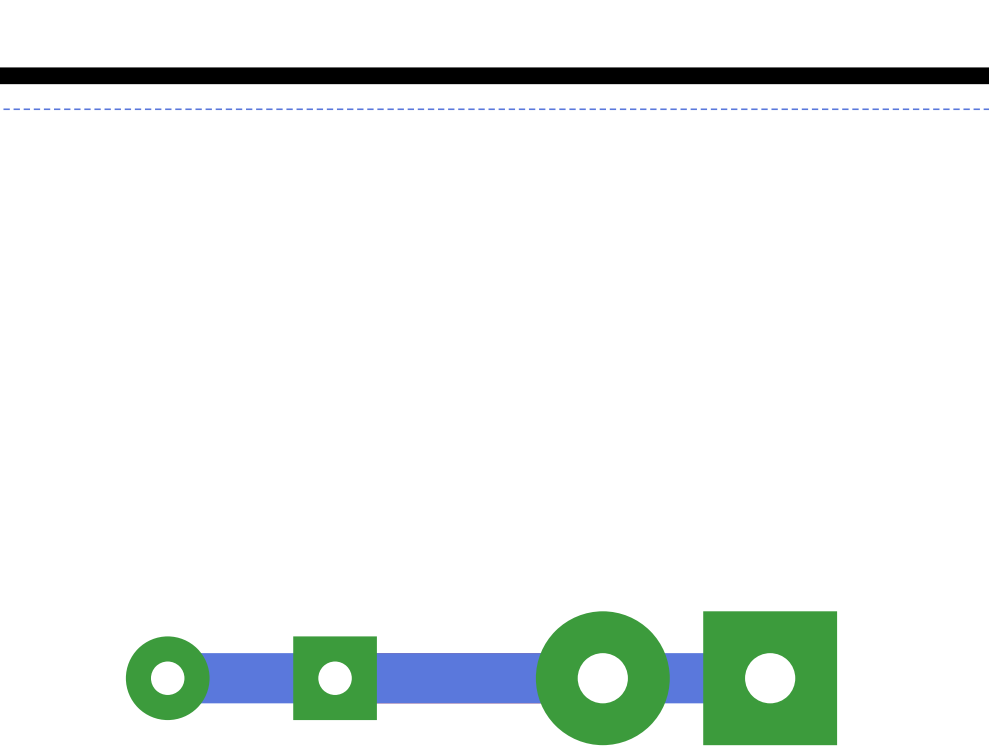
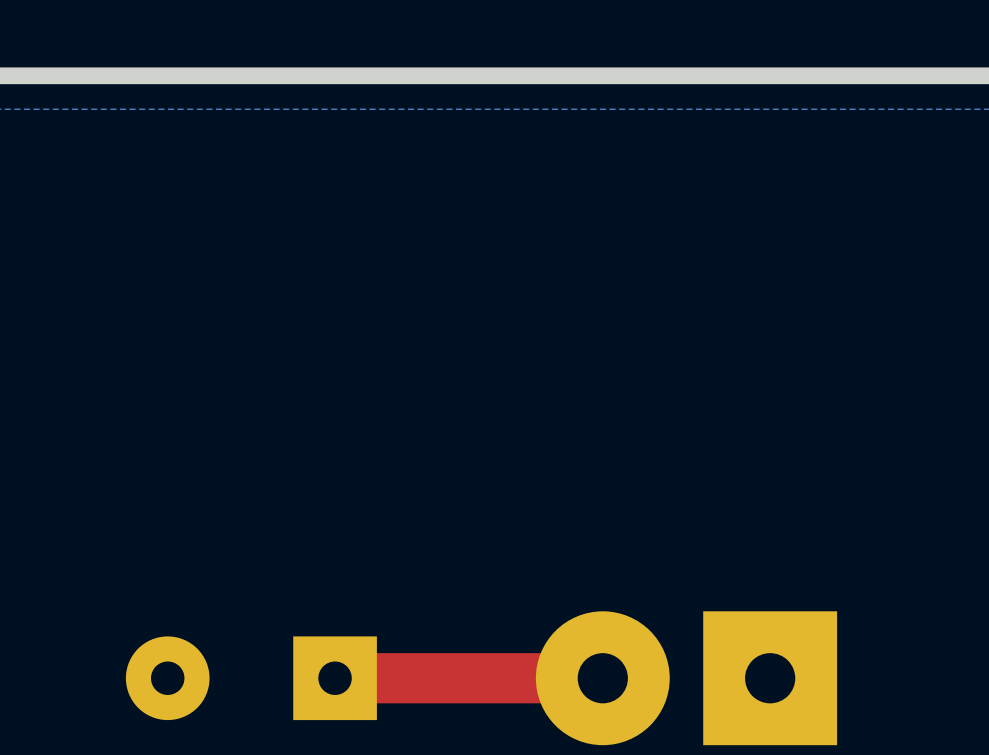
bottom track: (770, 678) (167, 678) -> none

